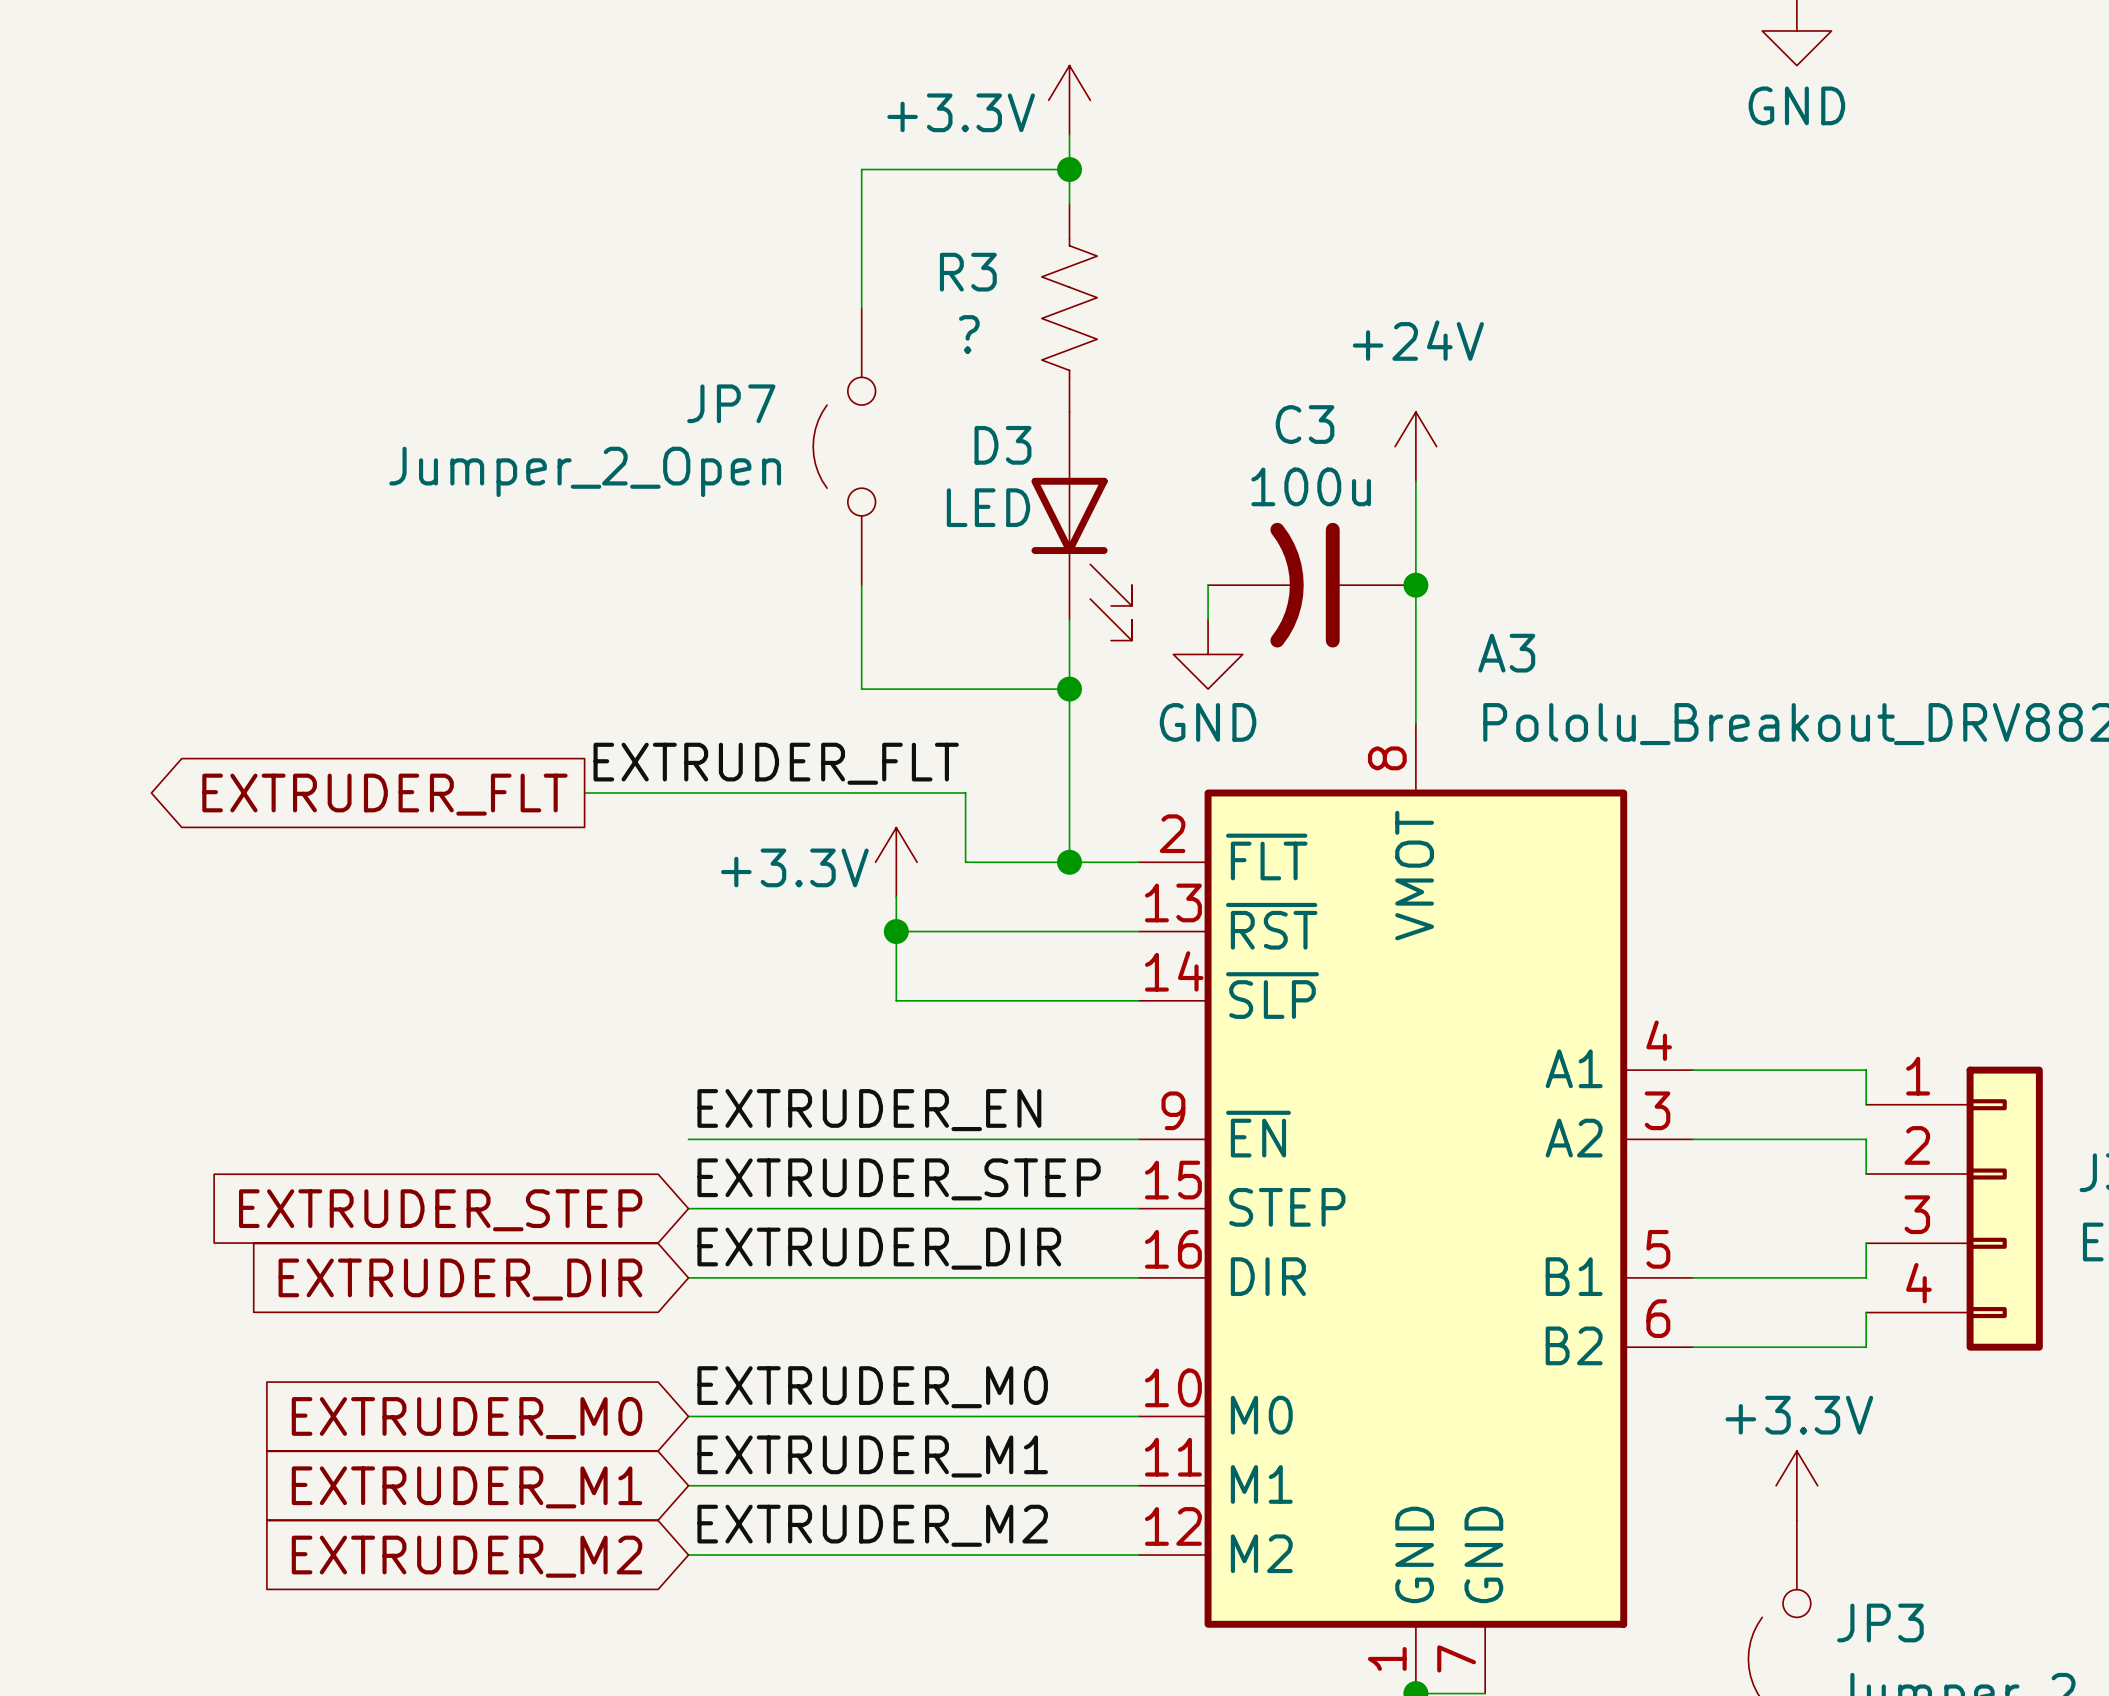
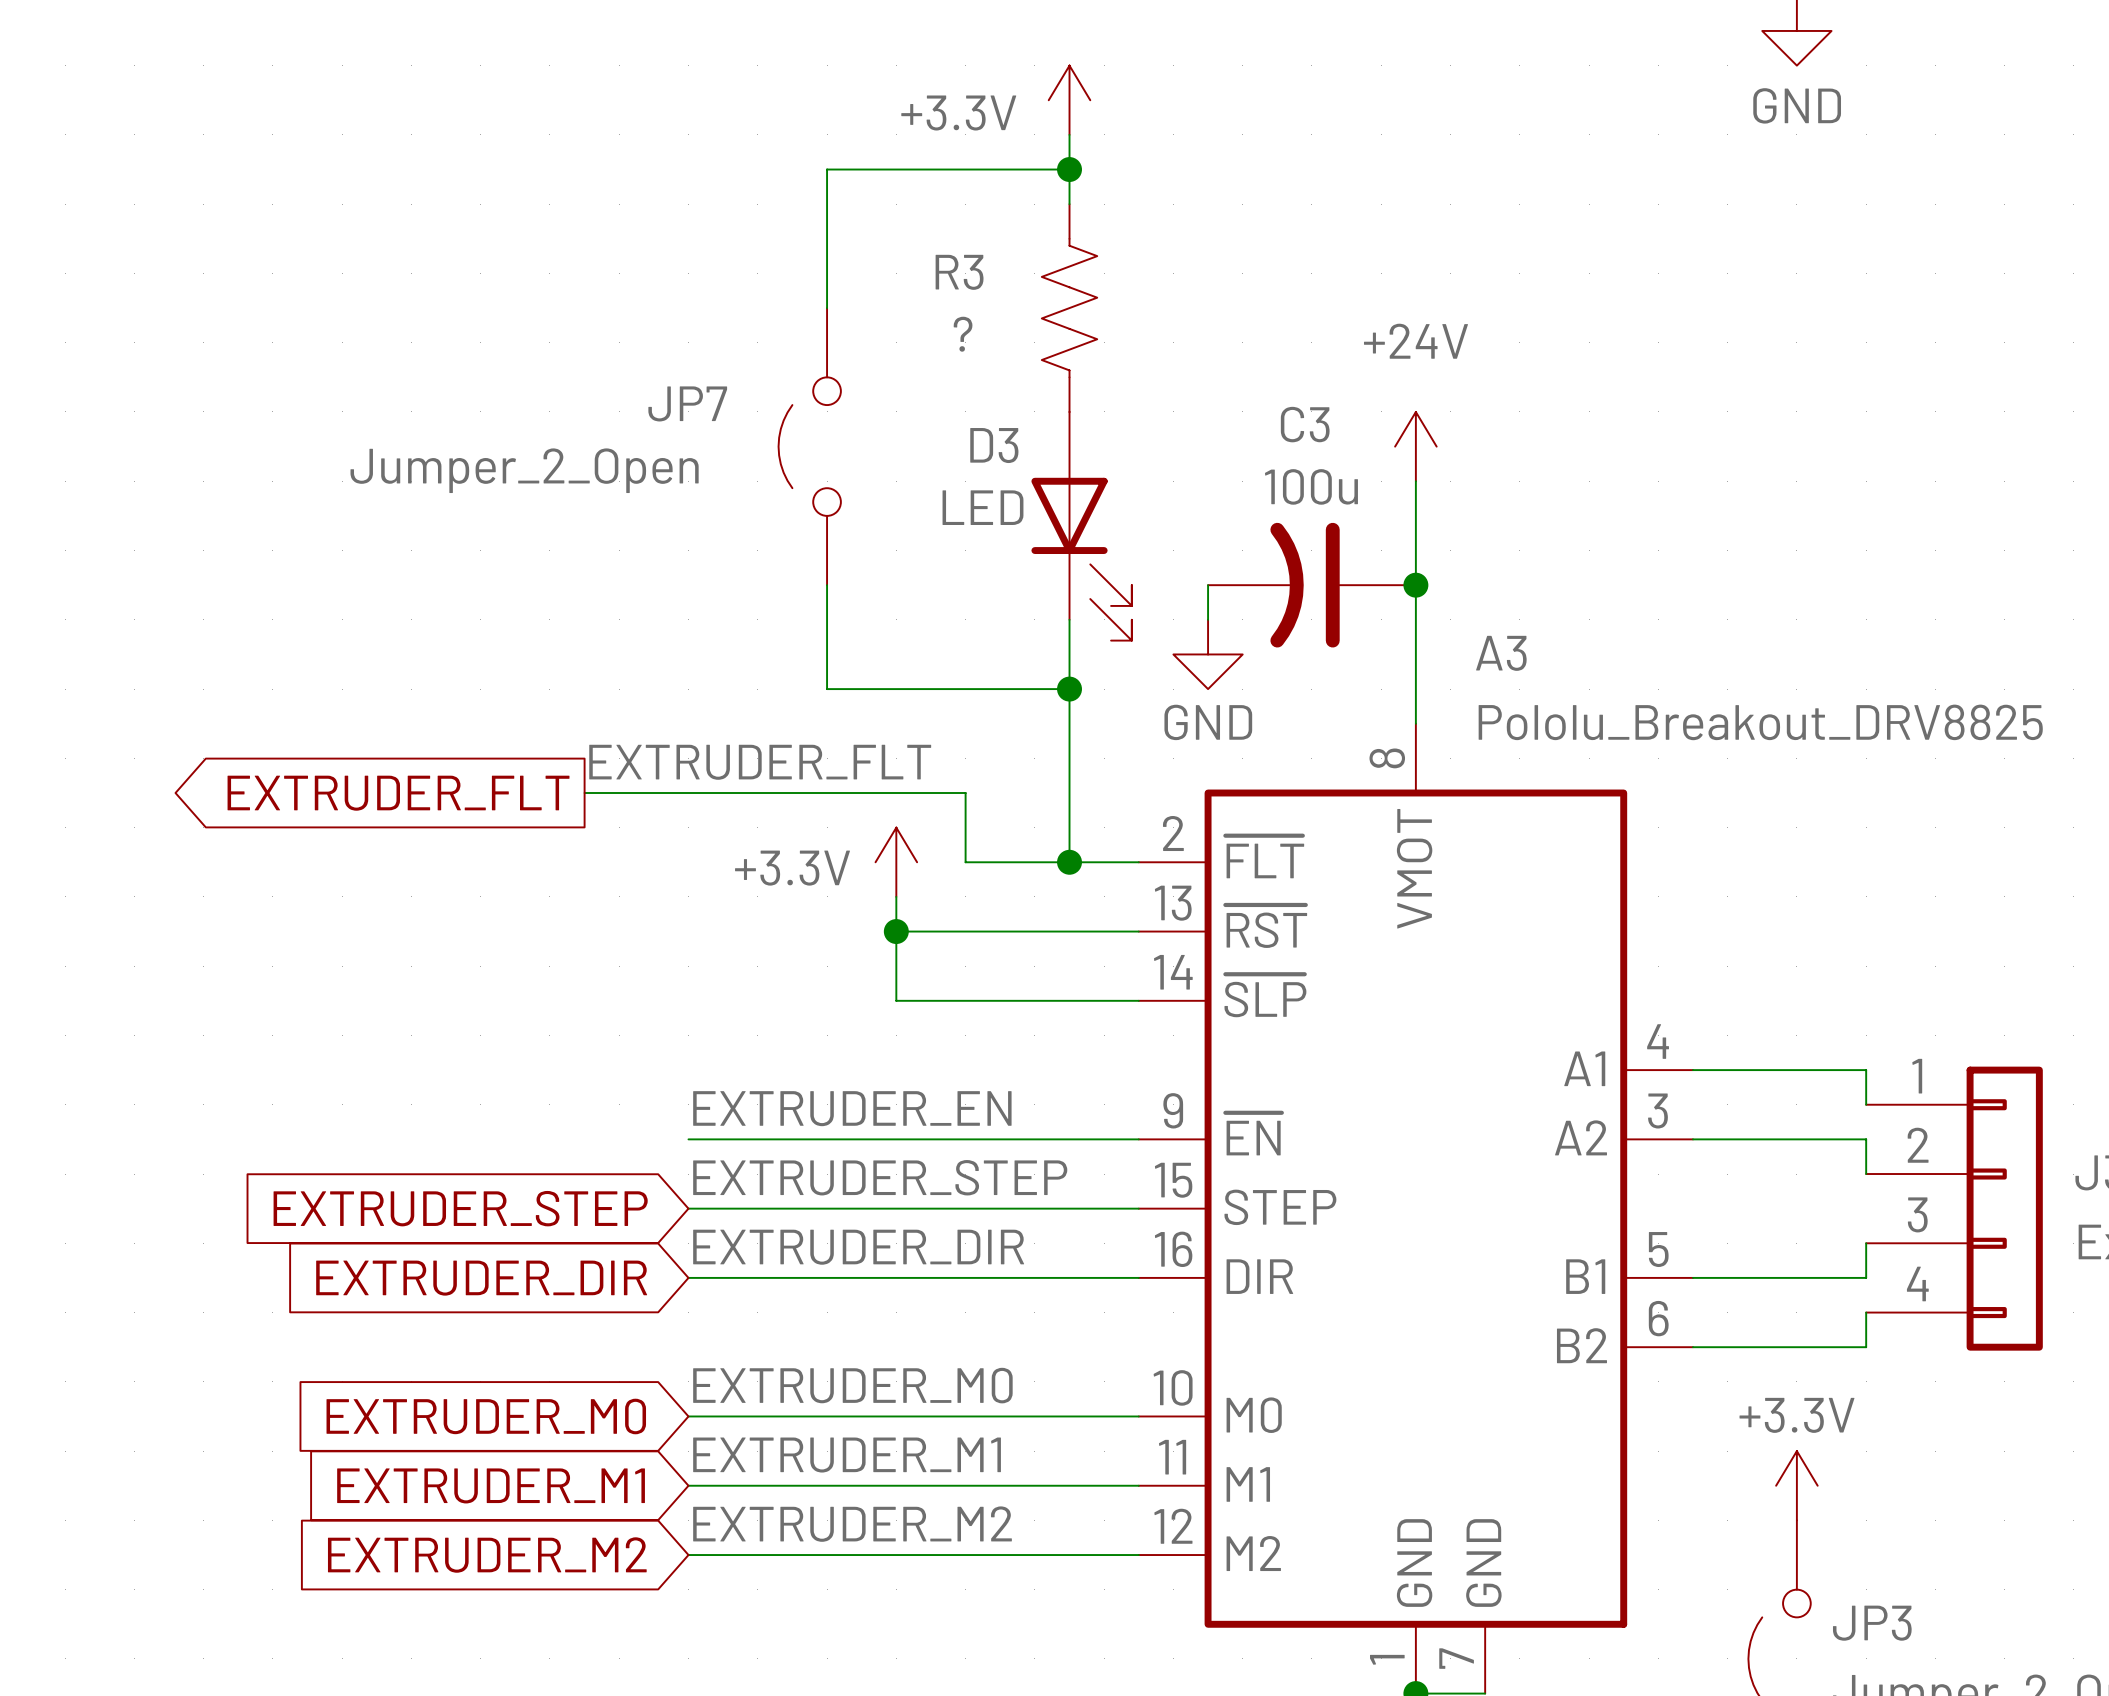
wire: (861, 169) (861, 308) -> (861, 169) (827, 169) (827, 308)
JP7 position: (844, 446) -> (809, 446)
wire: (861, 585) (861, 689) -> (827, 585) (827, 689) (861, 689)

